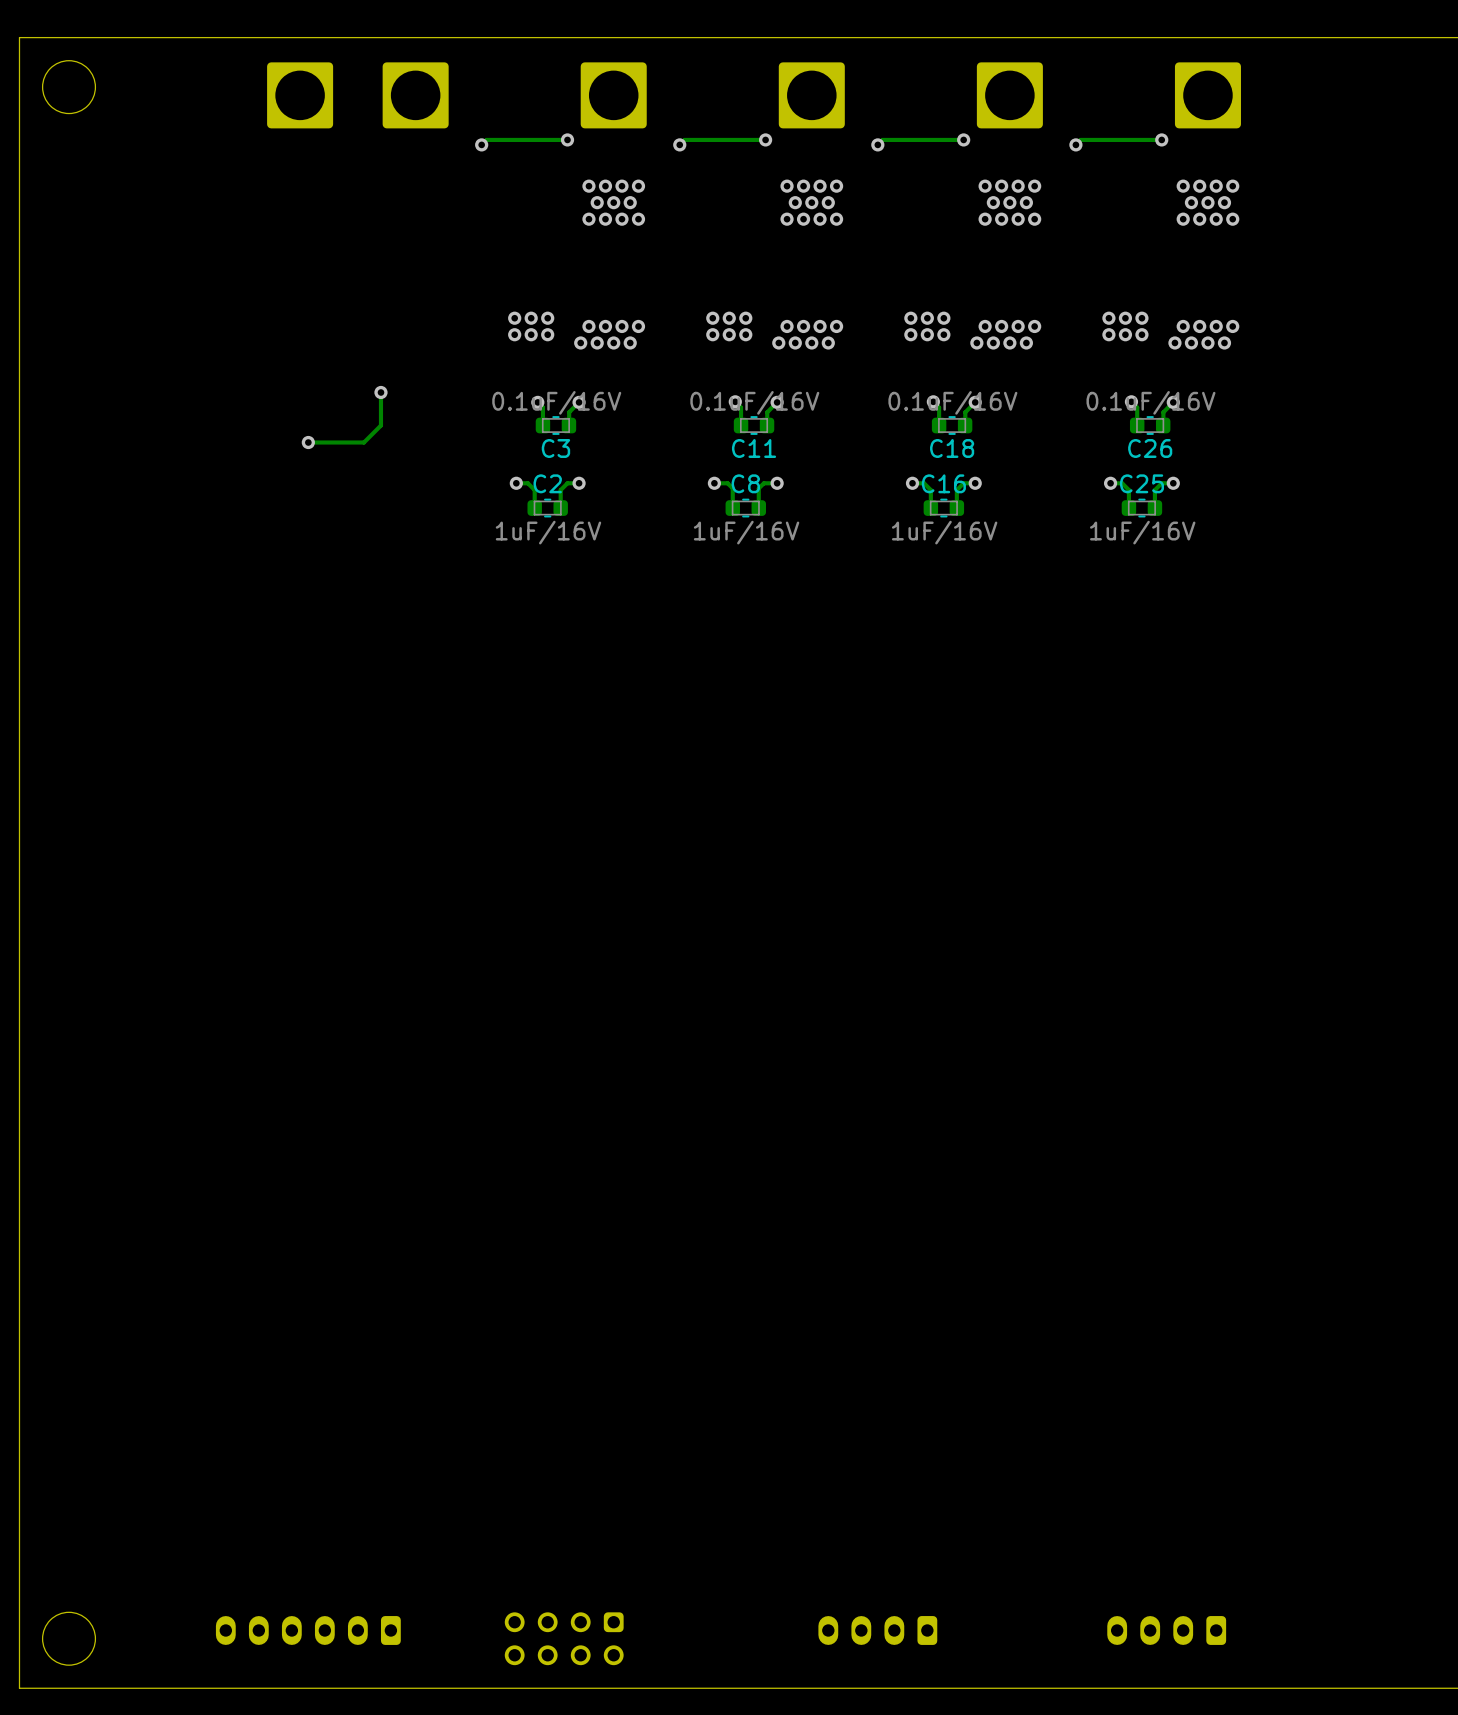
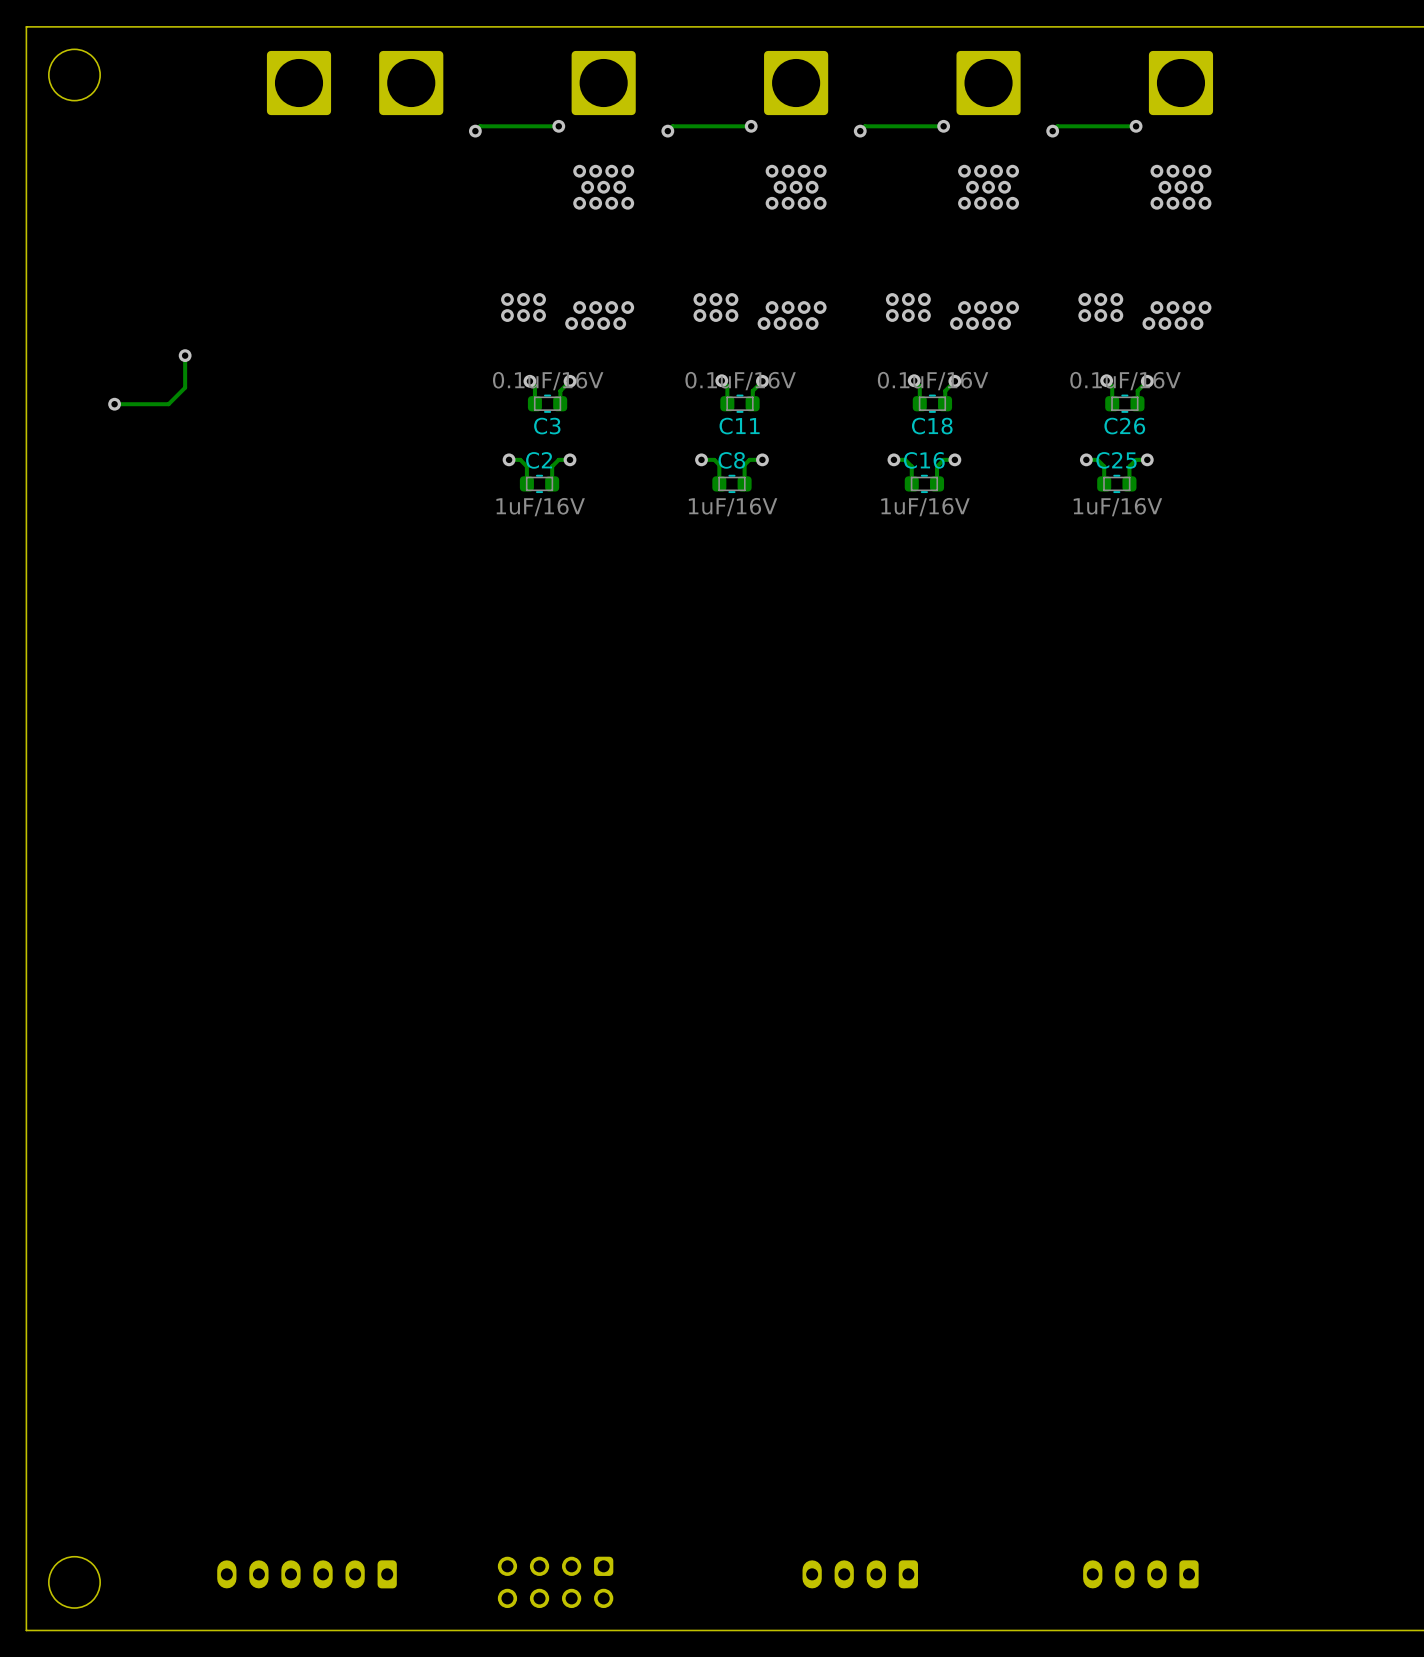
via: none -> (185, 355)
track: (380, 392) (380, 425) (363, 442) (308, 442) -> (185, 355) (185, 387) (168, 404) (114, 404)
via: (380, 392) -> none
via: none -> (114, 404)
via: (308, 442) -> none

